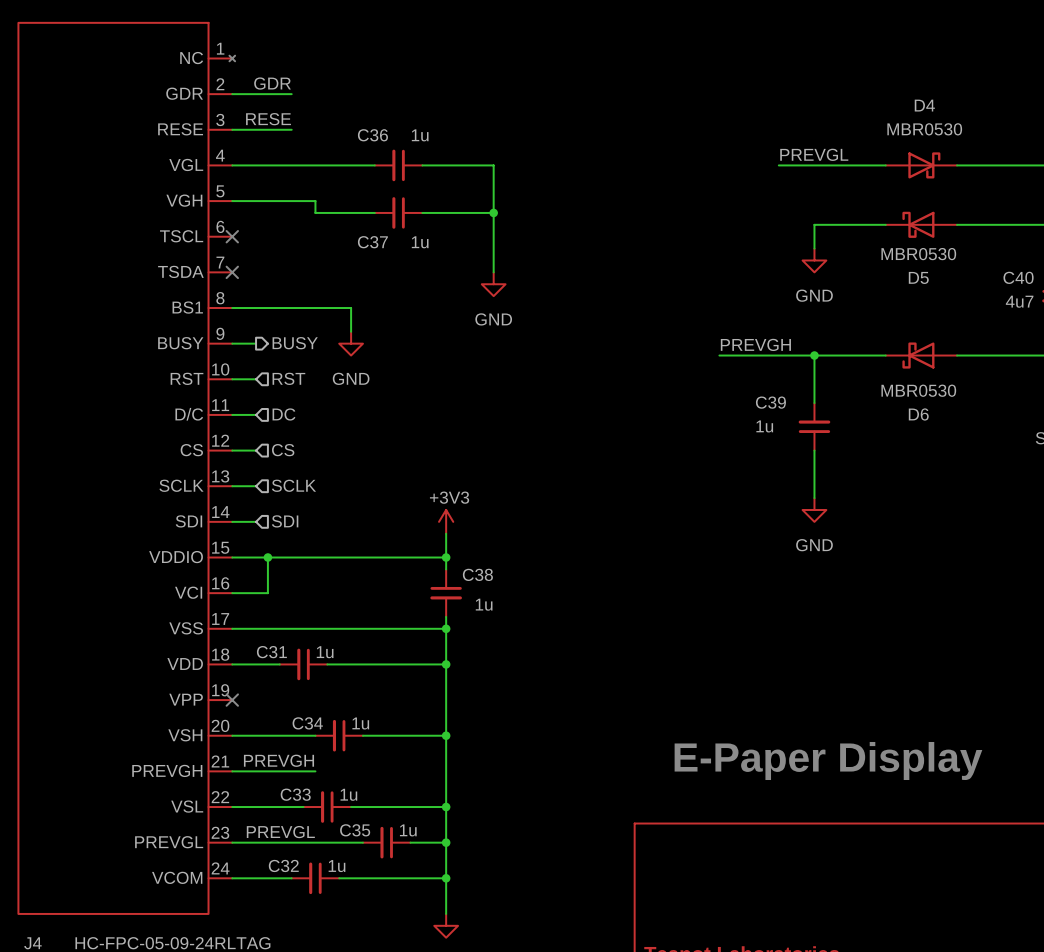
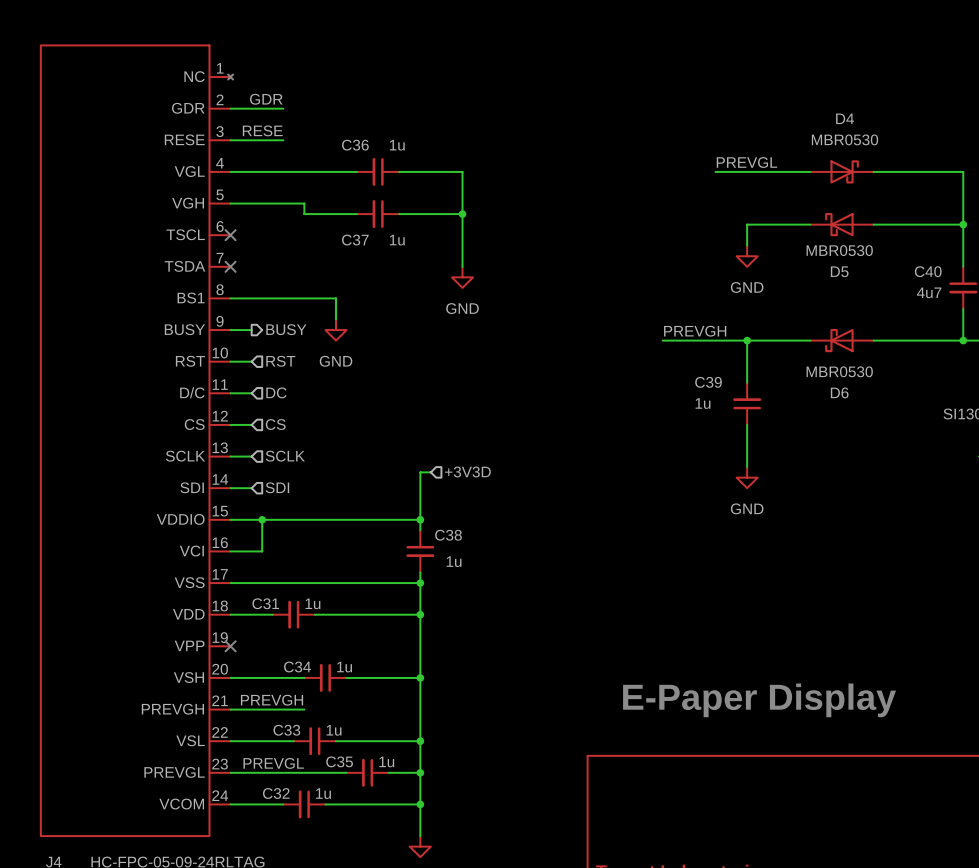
hierarchical label: none -> +3V3D (467, 471)
power symbol: +3V3 (446, 521) -> none

